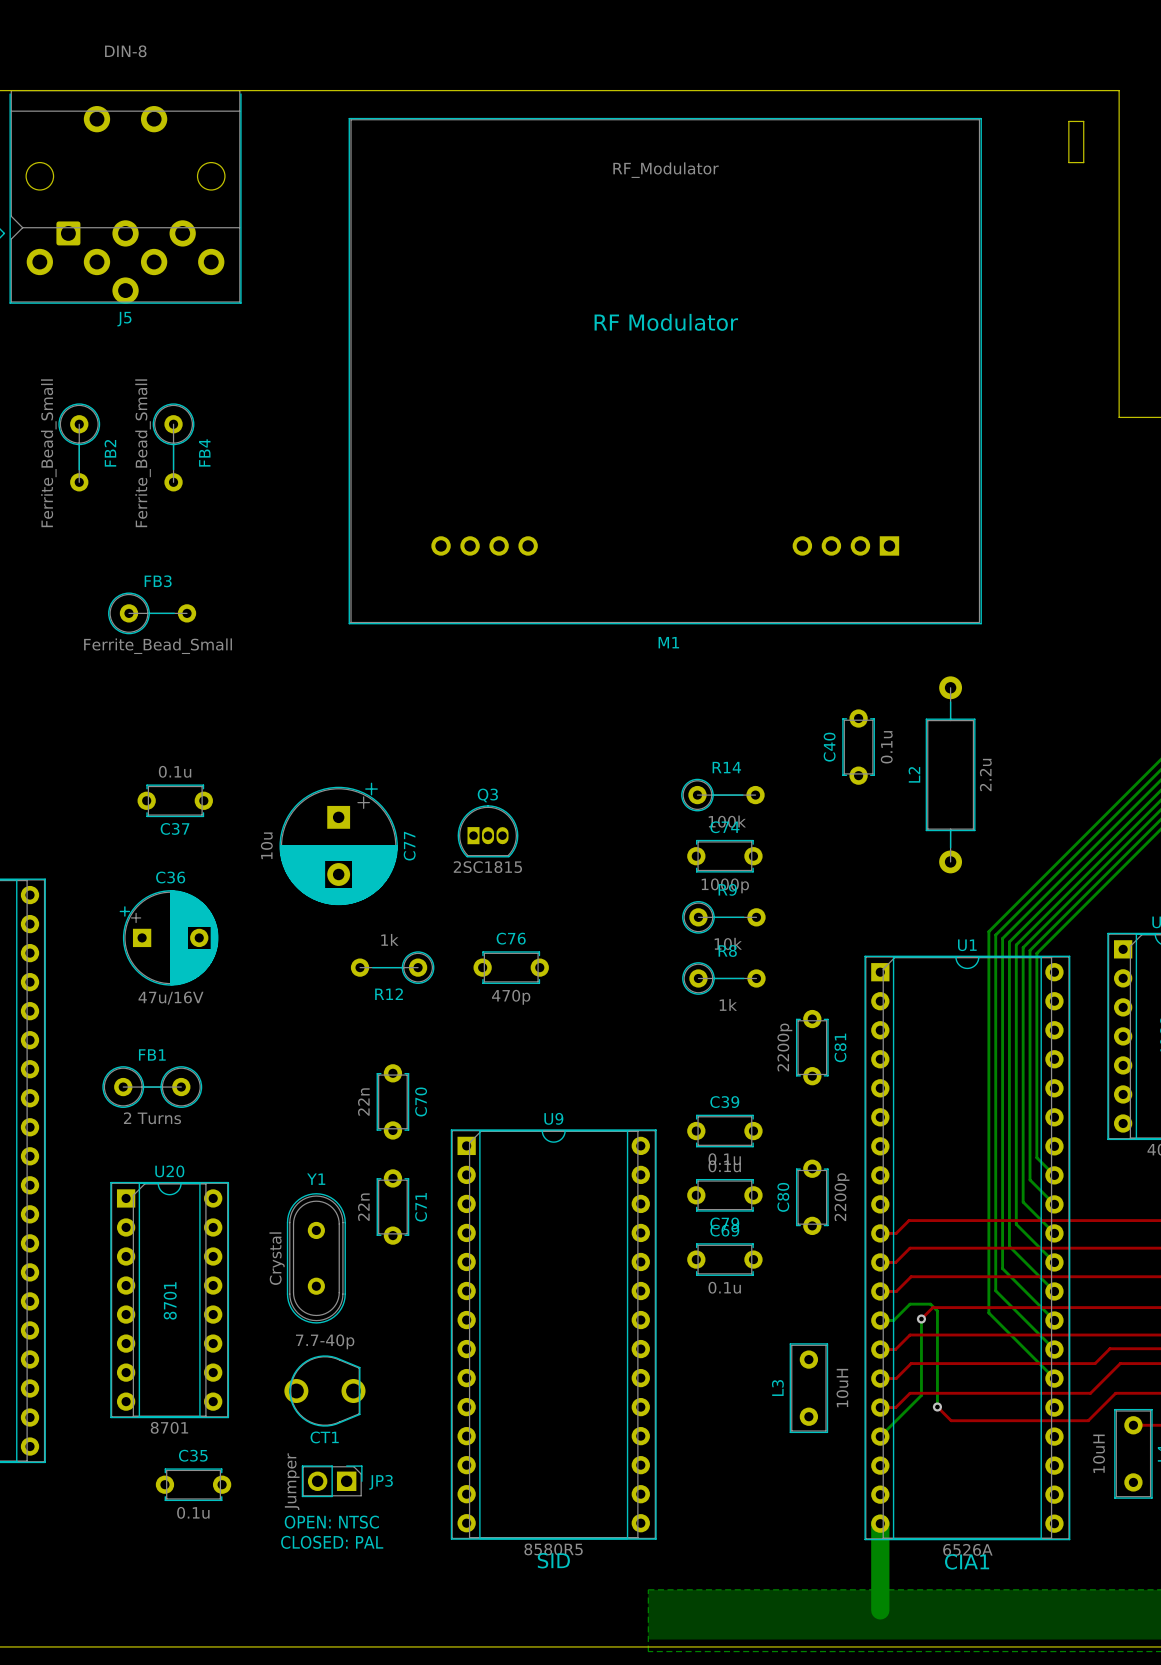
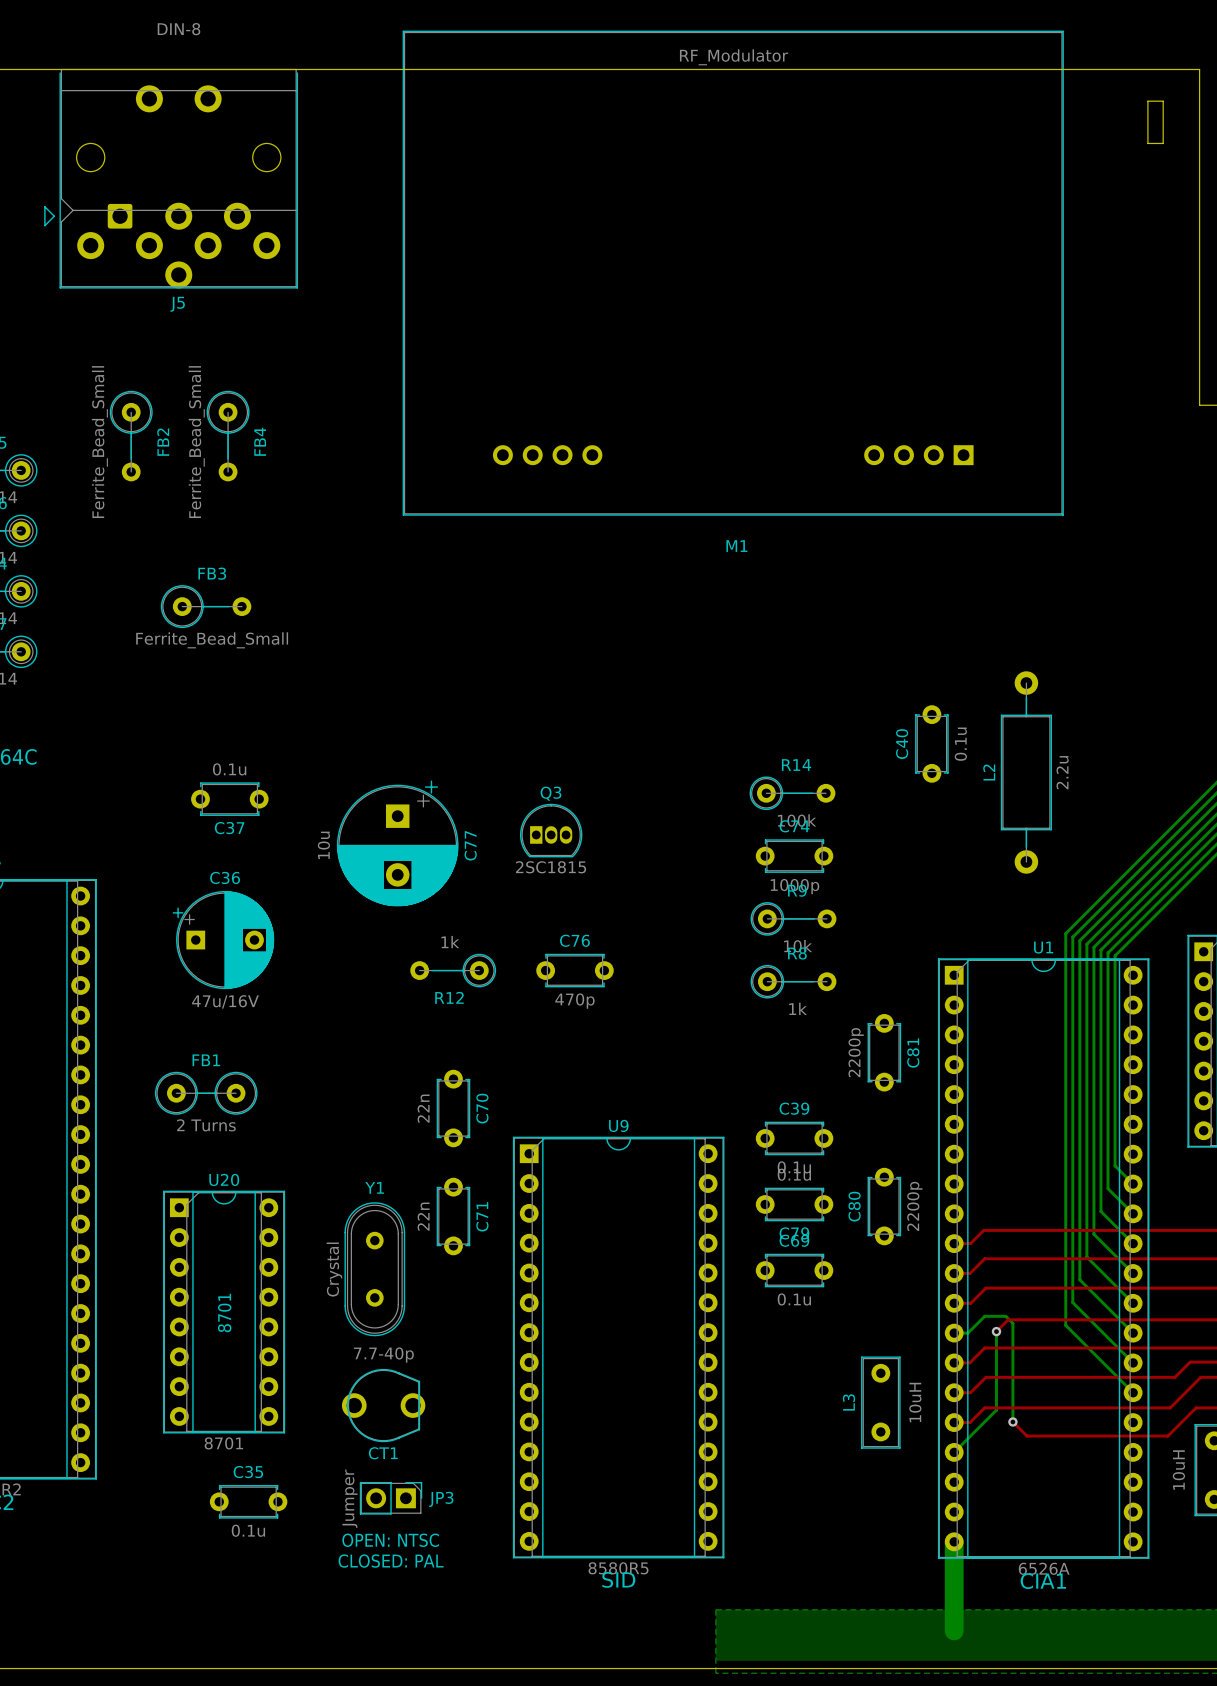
M1 footprint: [348, 117, 982, 625] -> [402, 30, 1064, 516]

